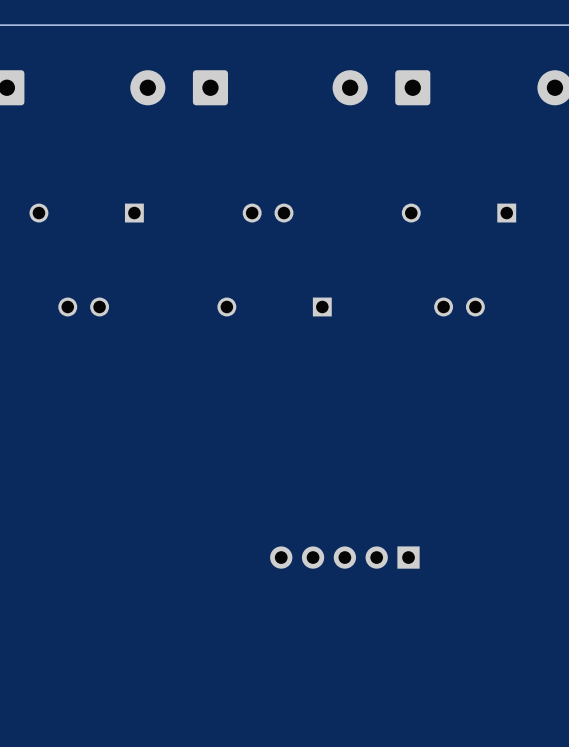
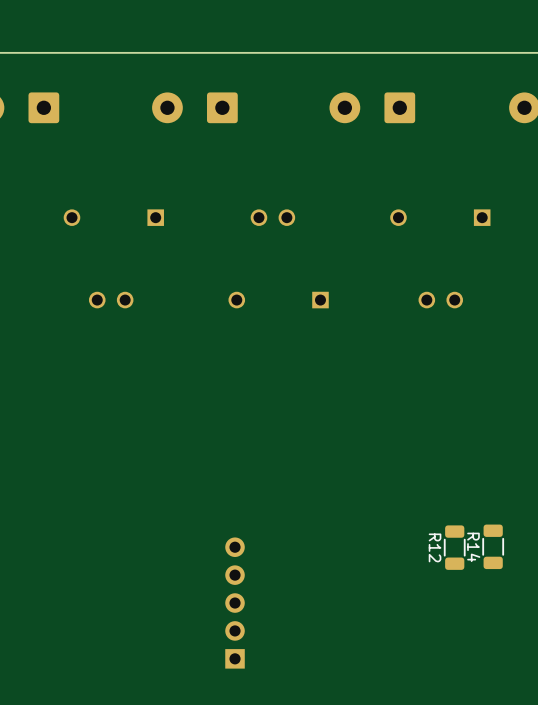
part rotation: 0° (344, 557) -> 90° clockwise (235, 603)
part position: (344, 557) -> (235, 603)
R14: none -> (493, 546)
R12: none -> (454, 547)

